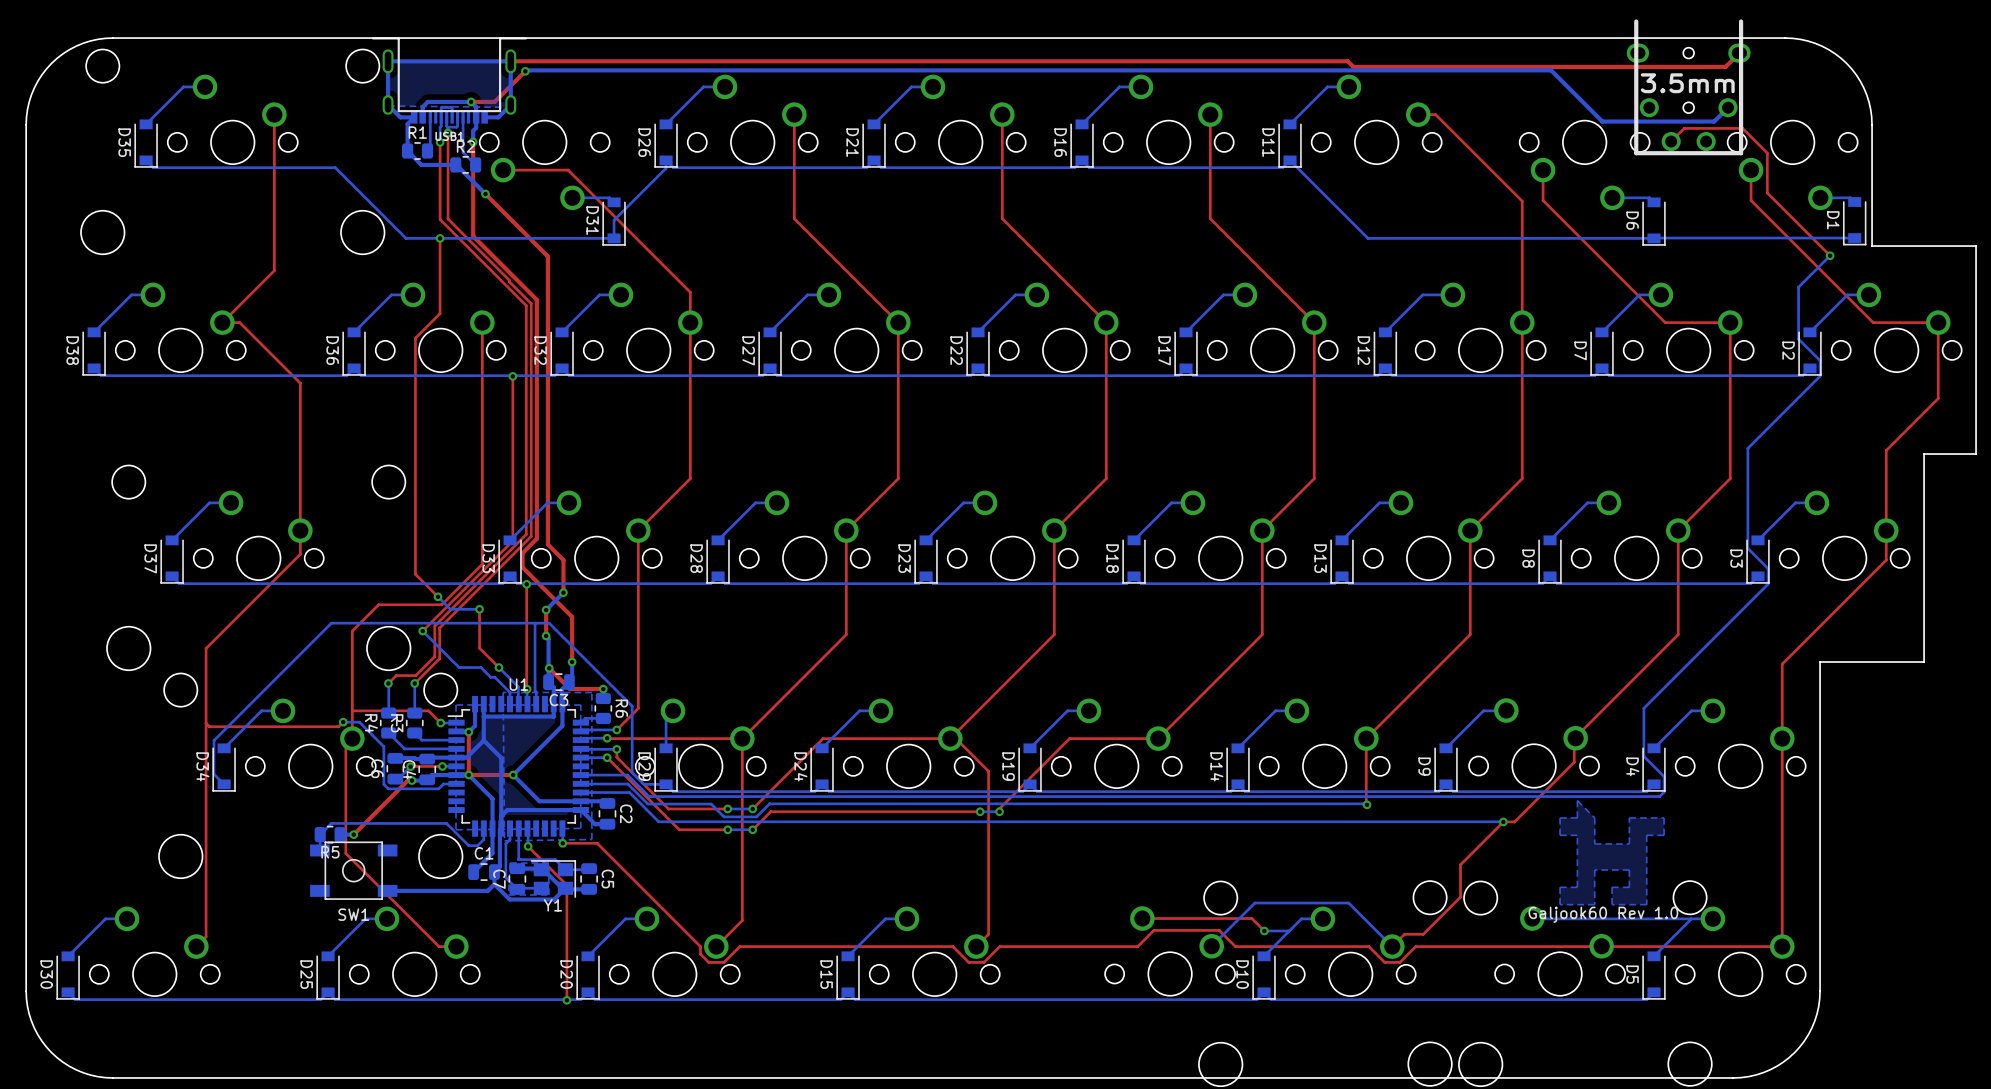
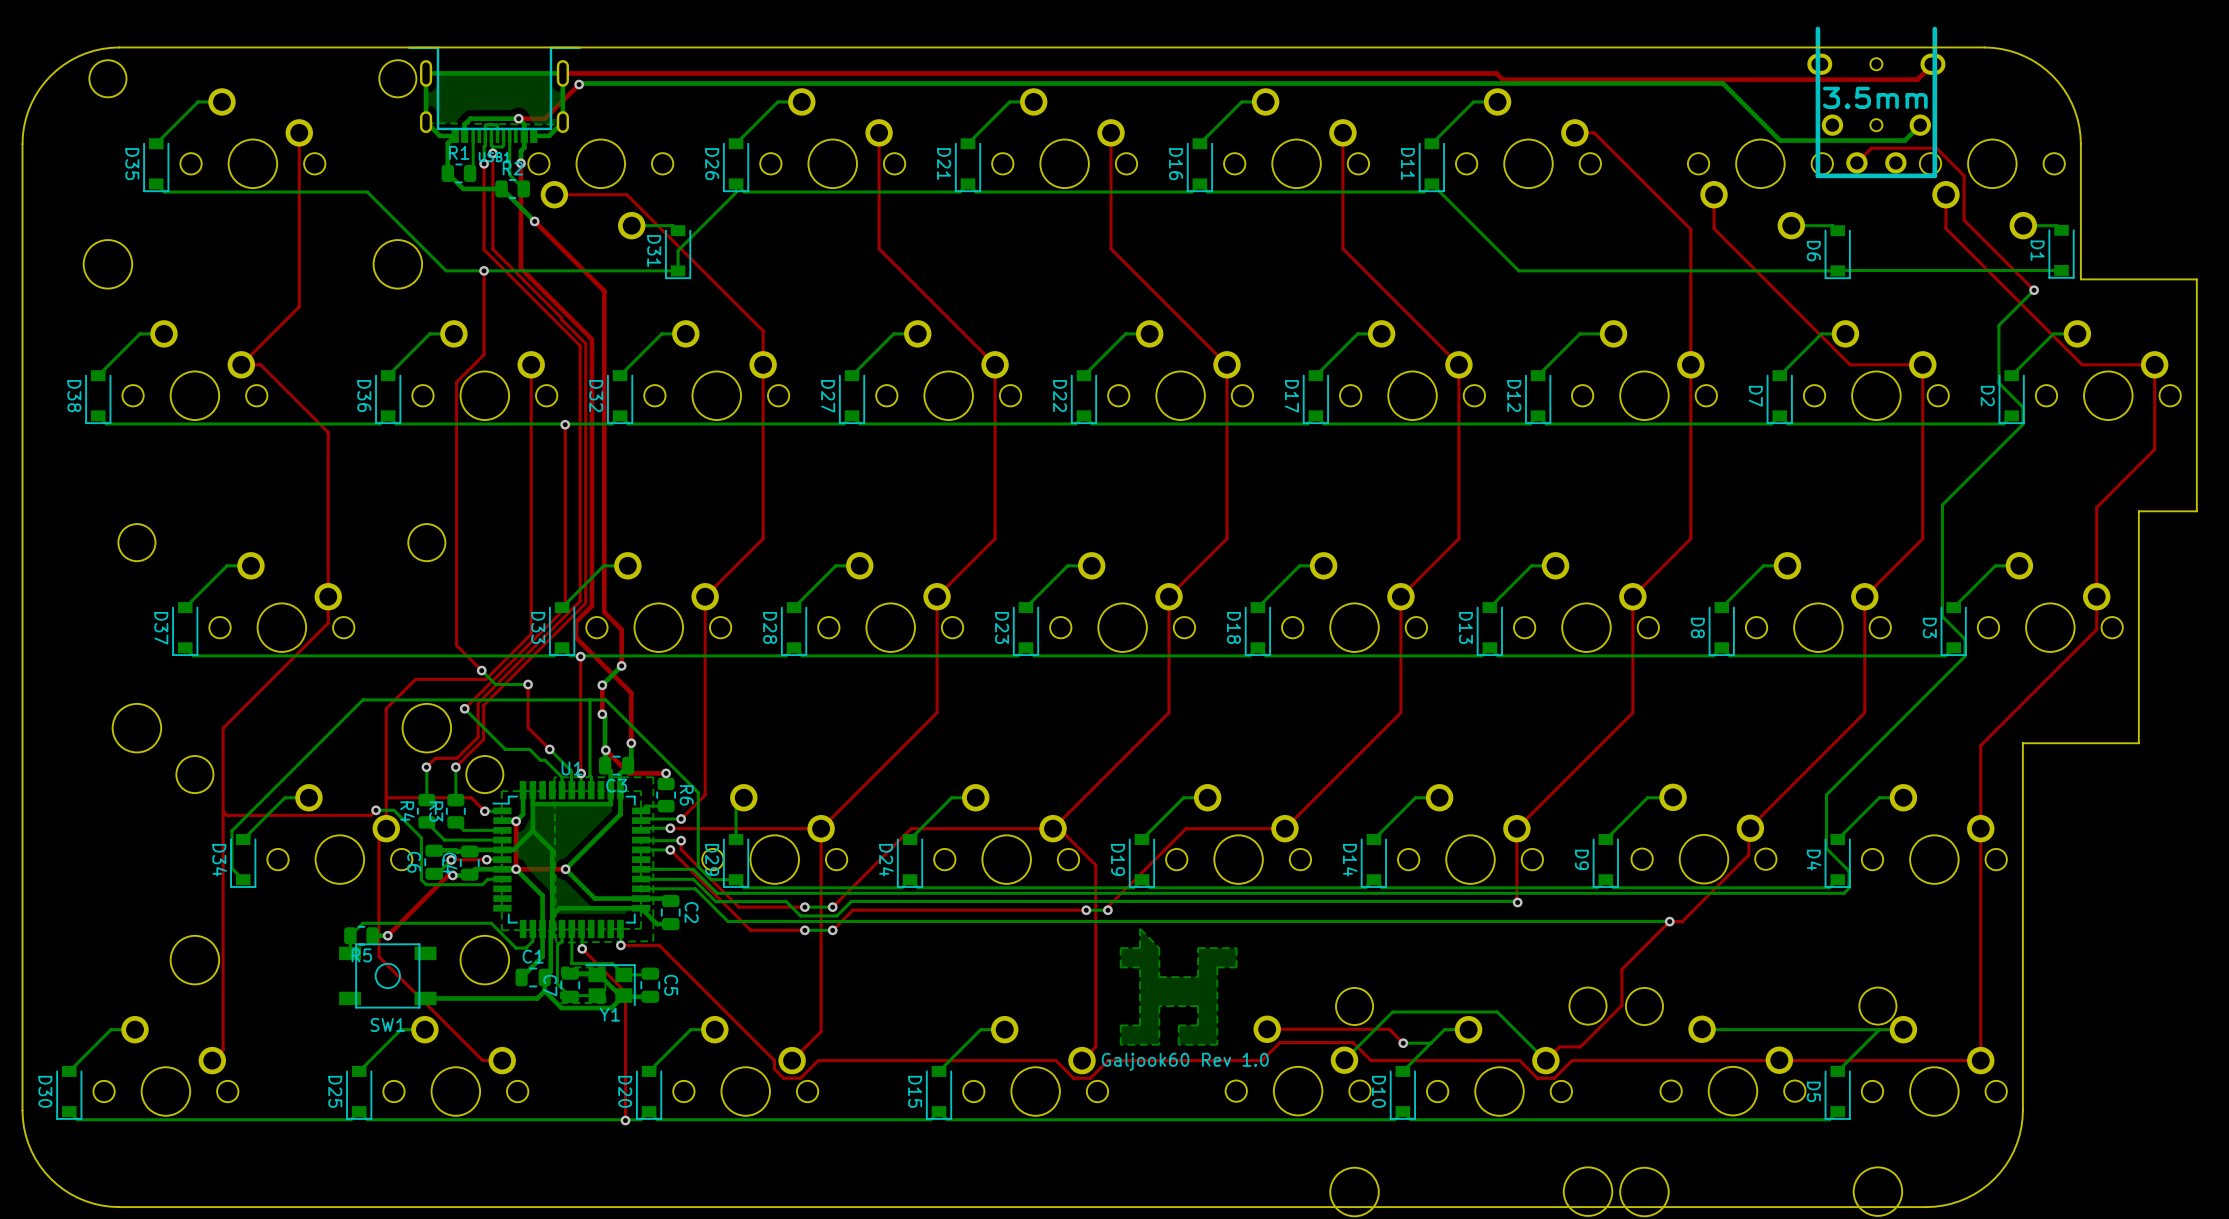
bottom zone outline: (1577, 800) (1577, 817) (1560, 817) (1560, 835) (1577, 835) (1577, 887) (1560, 887) (1560, 904) (1594, 904) (1594, 869) (1629, 869) (1629, 887) (1612, 887) (1612, 904) (1646, 904) (1646, 835) (1664, 835) (1664, 817) (1629, 817) (1629, 843) (1594, 843) (1594, 817) (1577, 800) -> none
bottom zone outline: none -> (1140, 928) (1140, 948) (1120, 948) (1120, 967) (1140, 967) (1140, 1025) (1120, 1025) (1120, 1044) (1159, 1044) (1159, 1006) (1198, 1006) (1198, 1025) (1178, 1025) (1178, 1044) (1217, 1044) (1217, 967) (1236, 967) (1236, 948) (1198, 948) (1198, 977) (1159, 977) (1159, 948) (1140, 928)
text: Galjook60 Rev 1.0 (1603, 914) -> none
text: none -> Galjook60 Rev 1.0 (1185, 1061)

